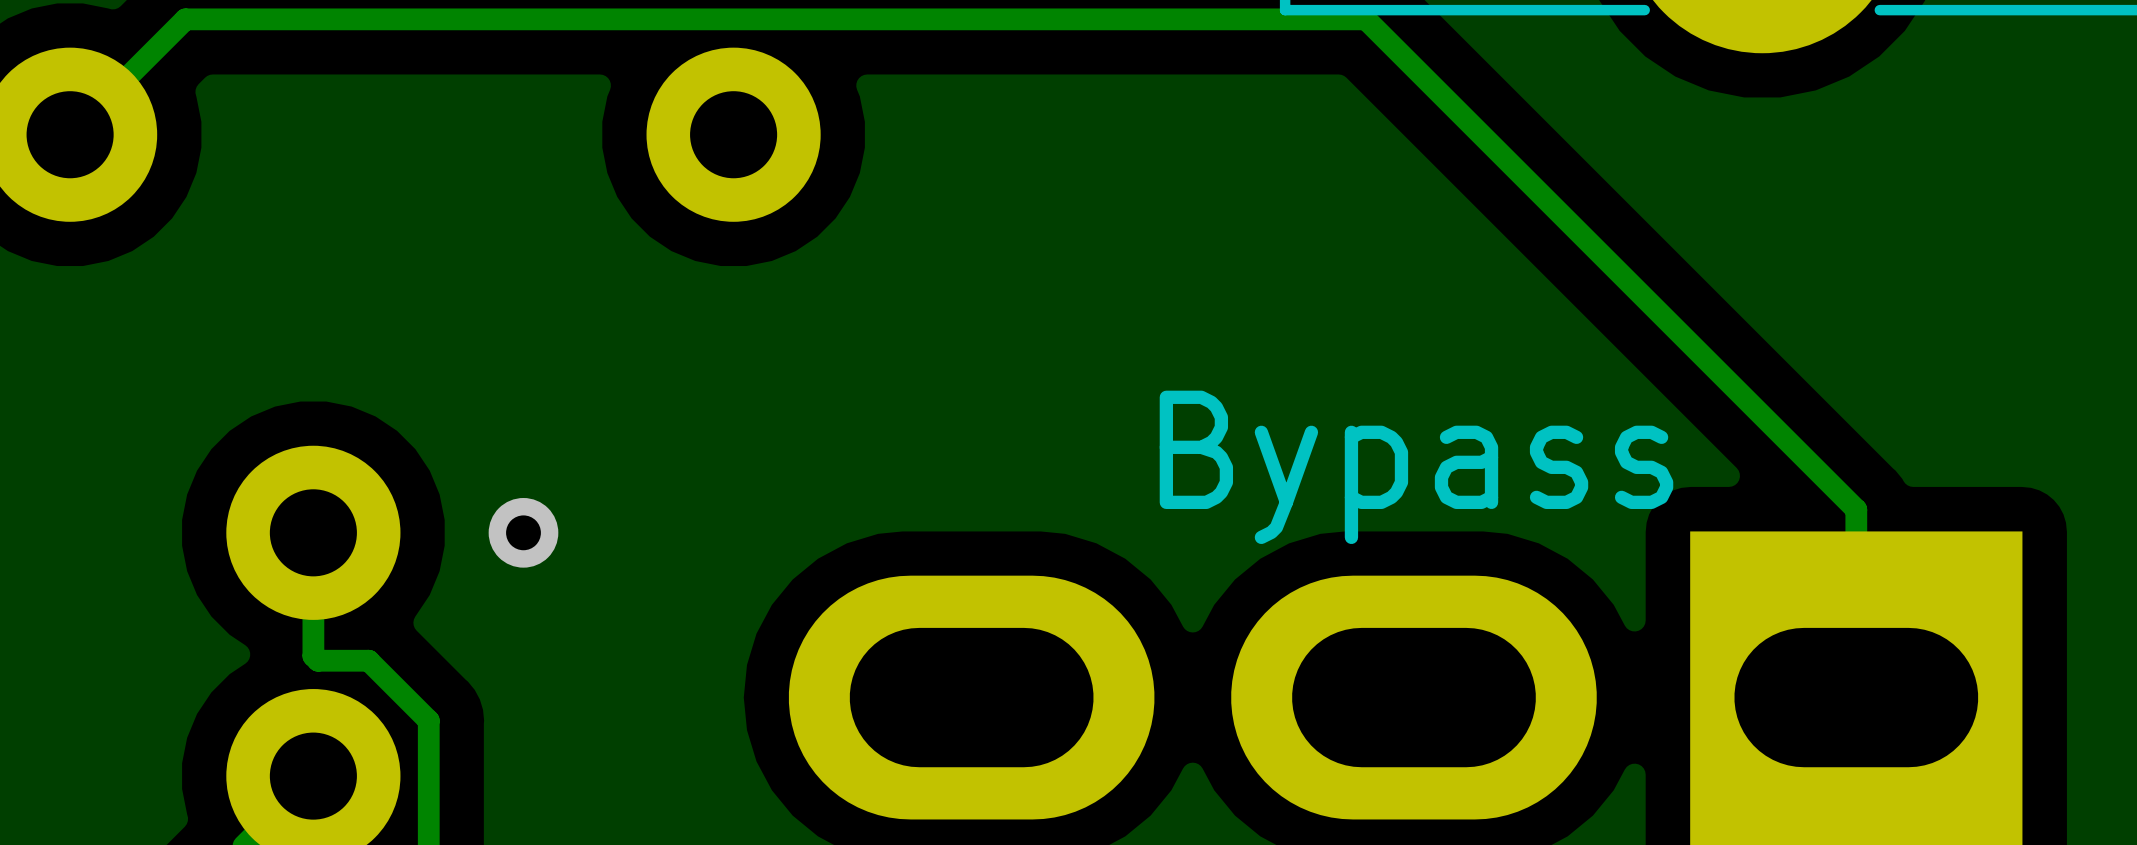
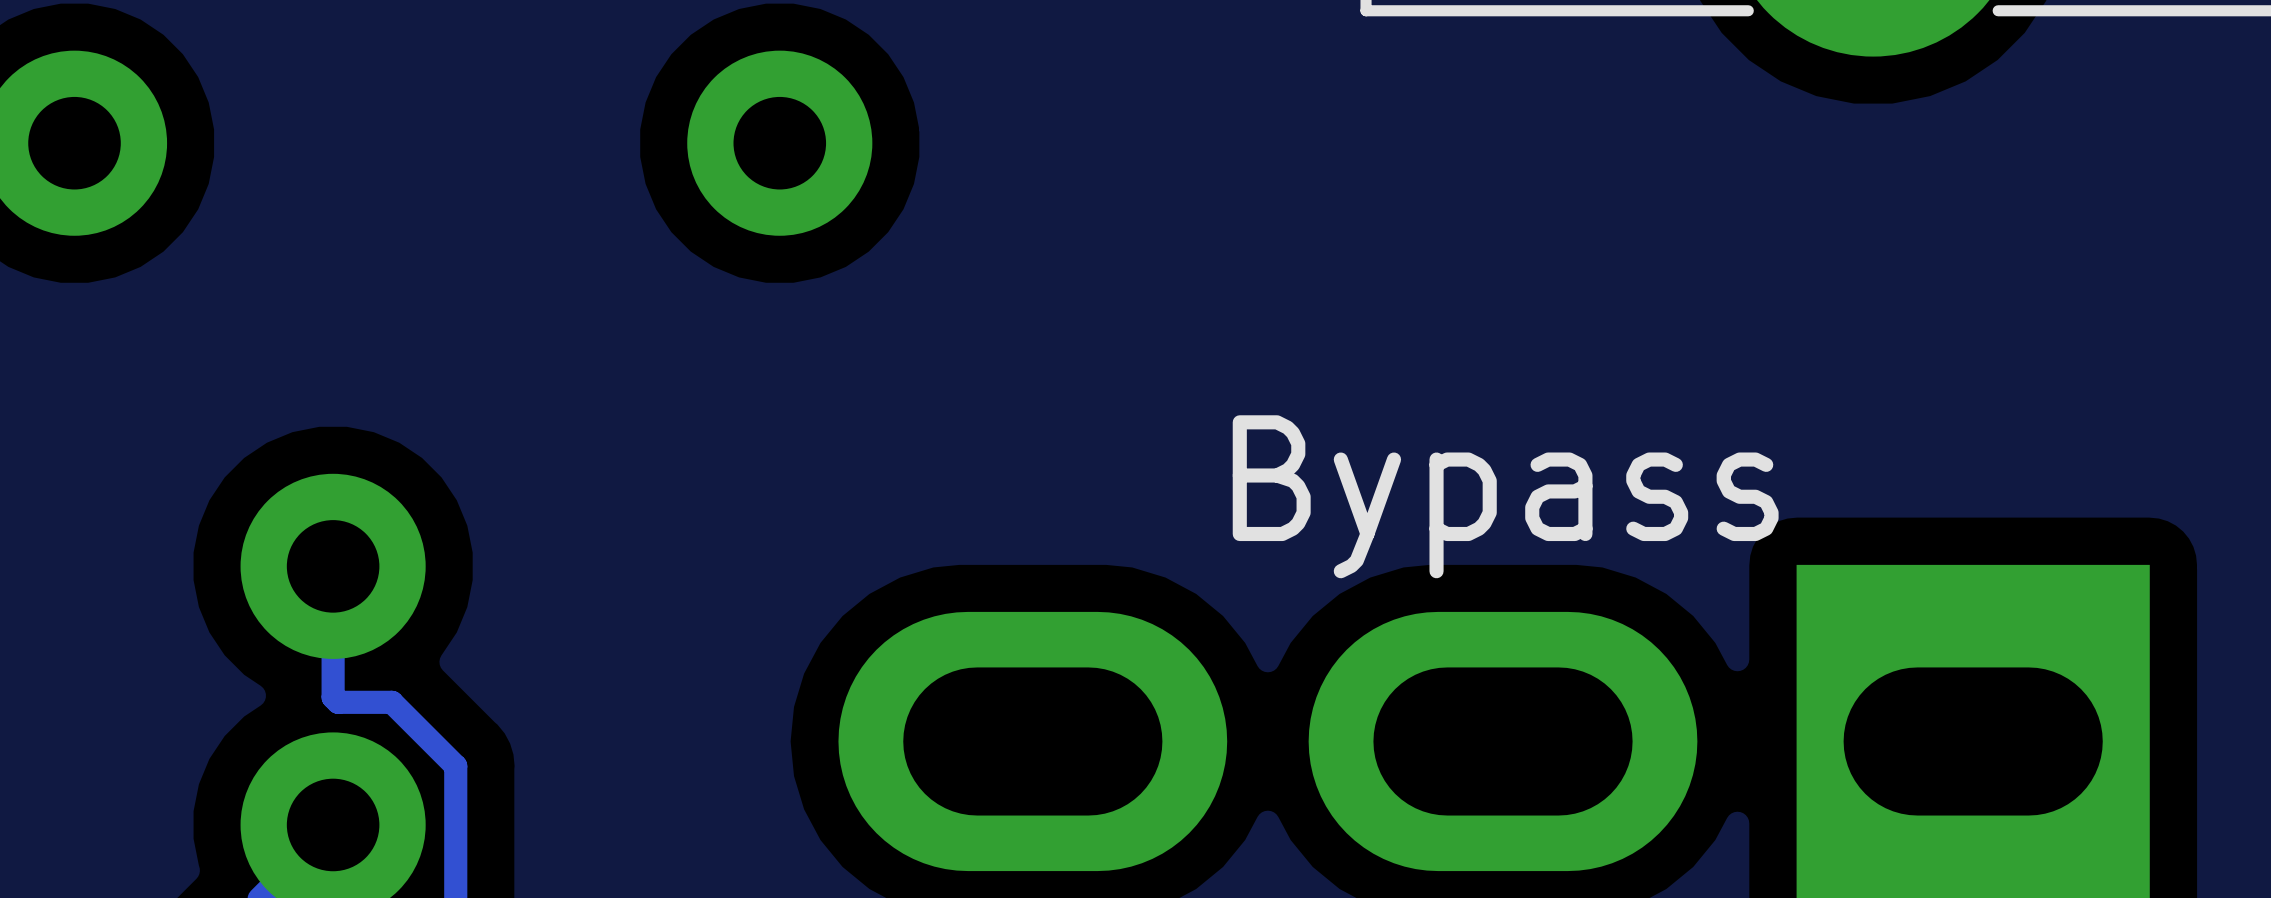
track: (70, 134) (185, 19) (1366, 19) (1856, 509) (1856, 697) -> none
via: (523, 532) -> none

